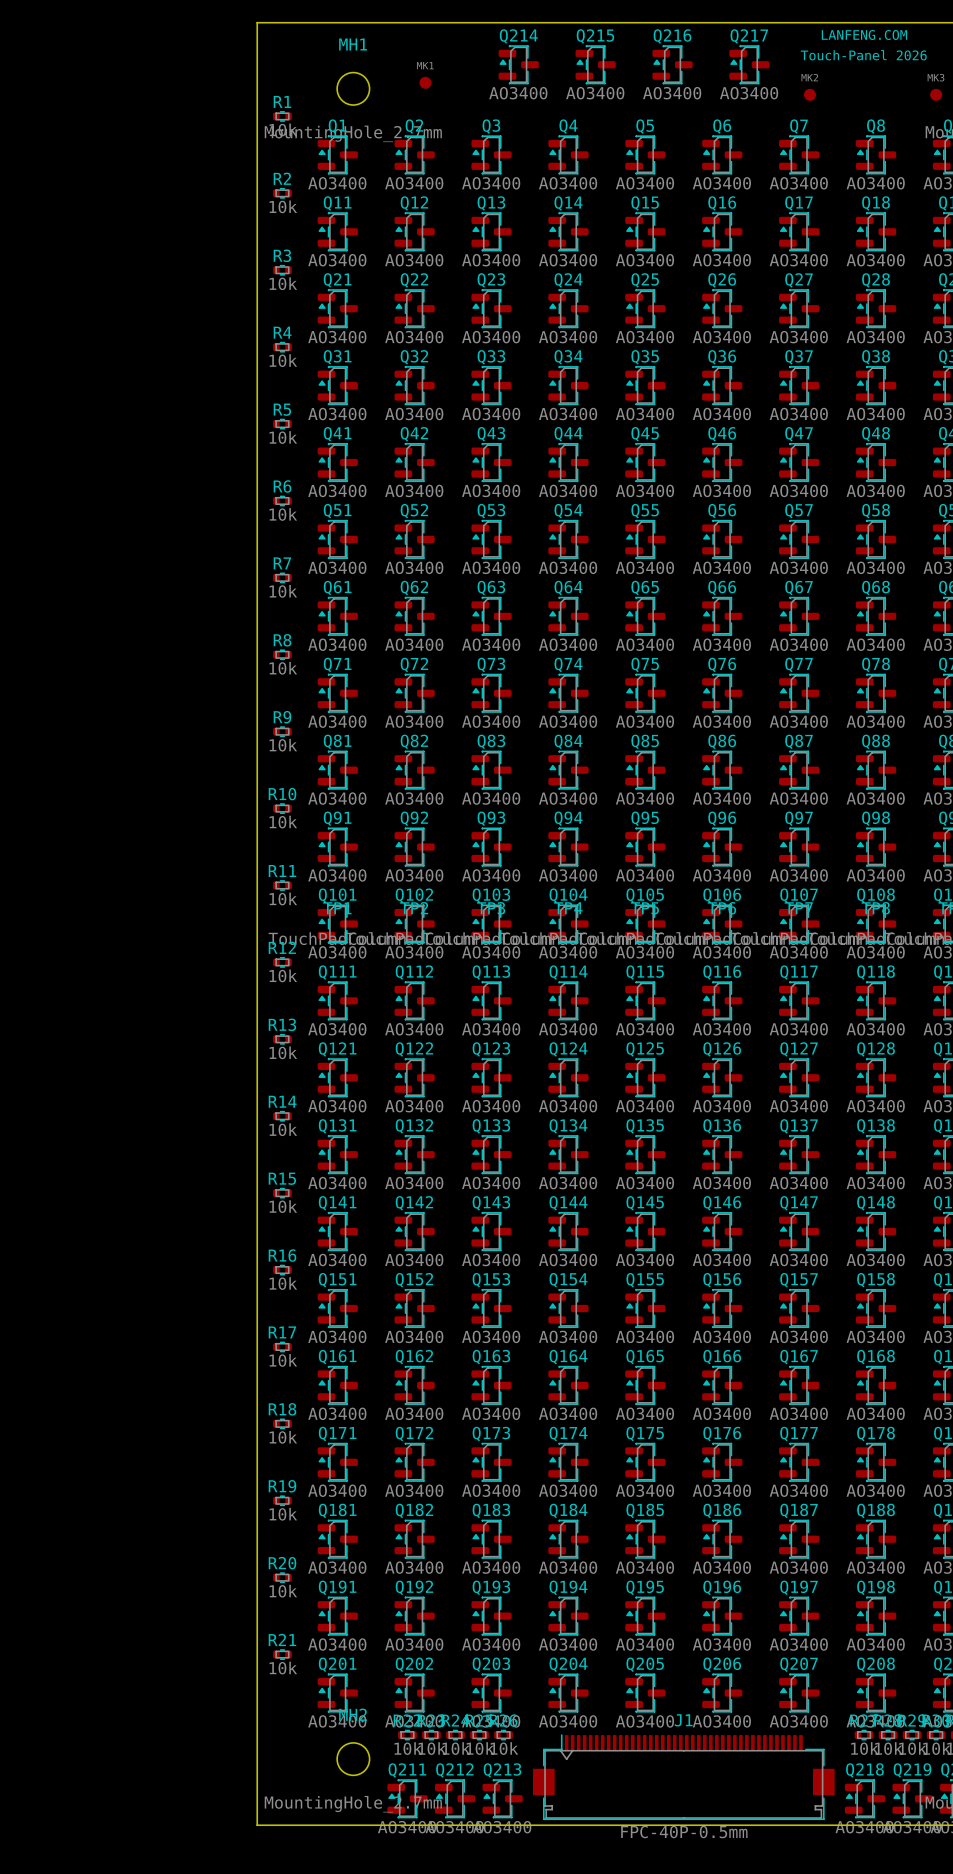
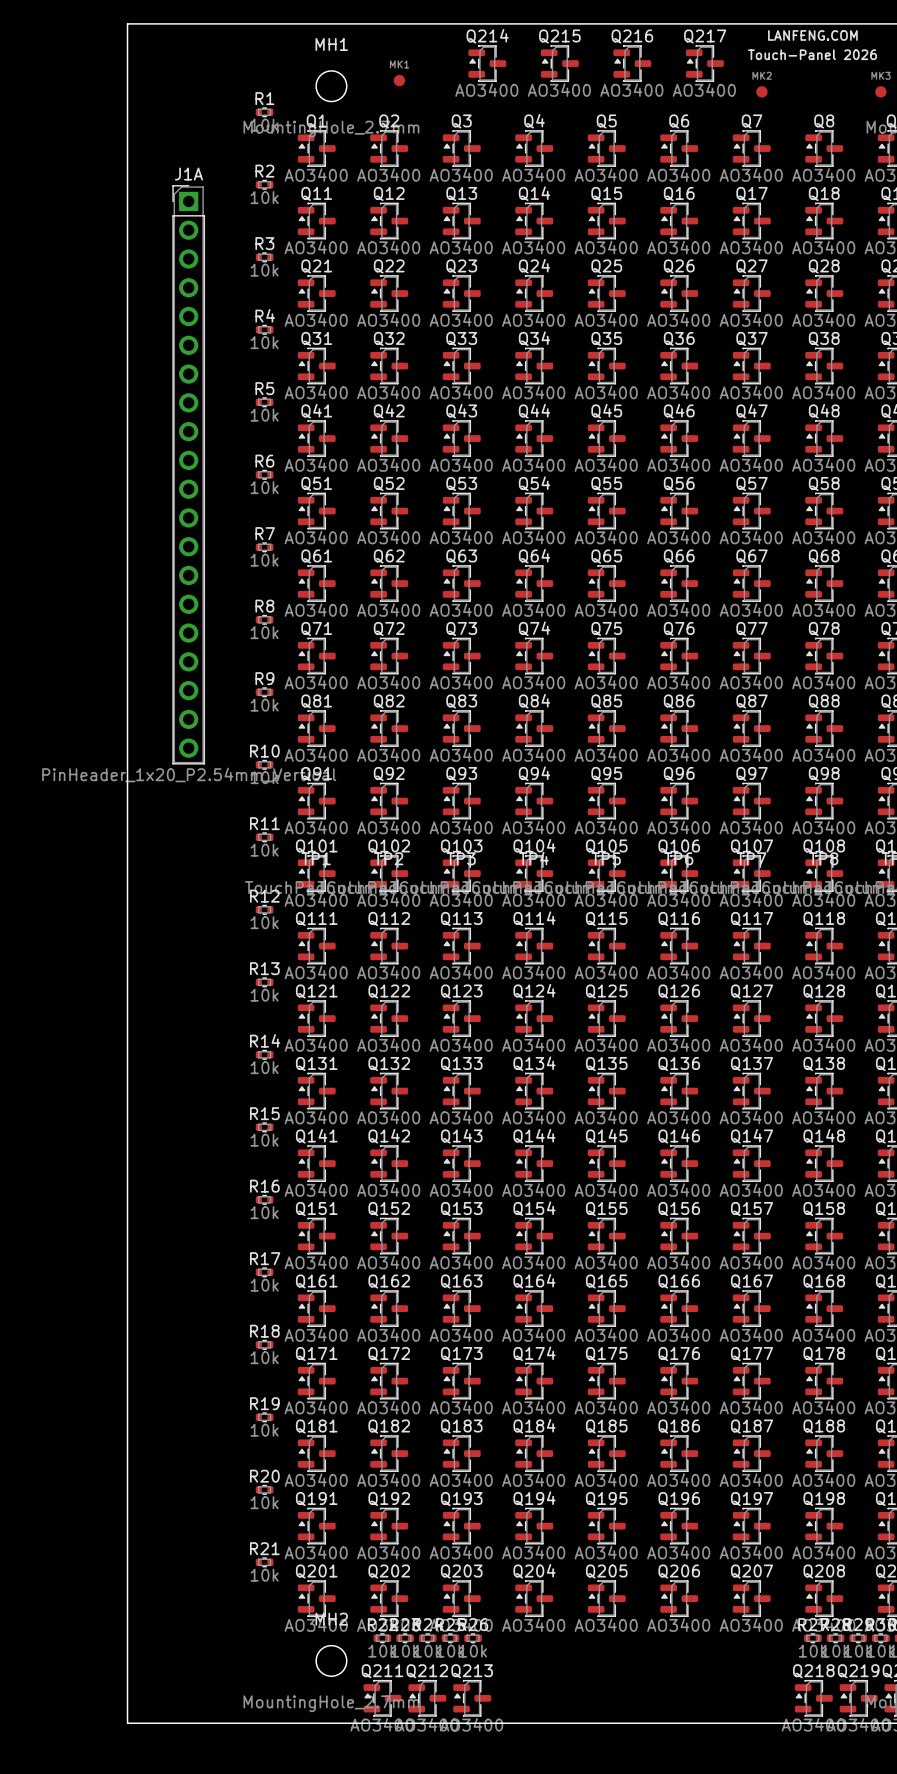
board edge: (257, 22) (257, 1825) -> (240, 23) (127, 23) (127, 1723) (240, 1723)
J1A: none -> PinHeader_1x20_P2.54mm_Vertical (188, 474)
J1: FPC-40P-0.5mm (683, 1777) -> none

